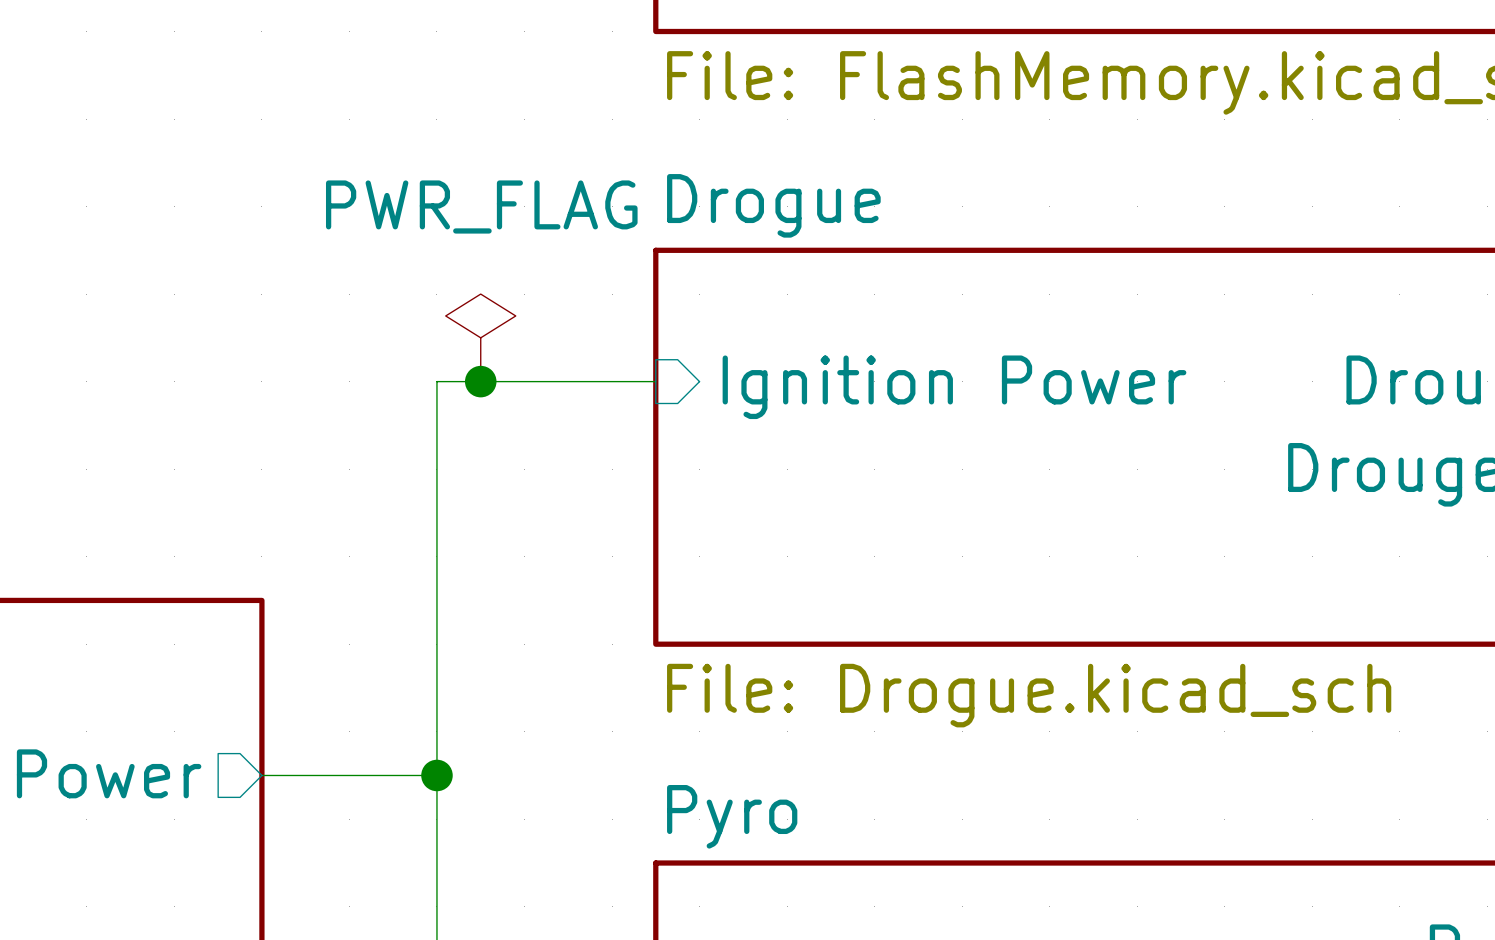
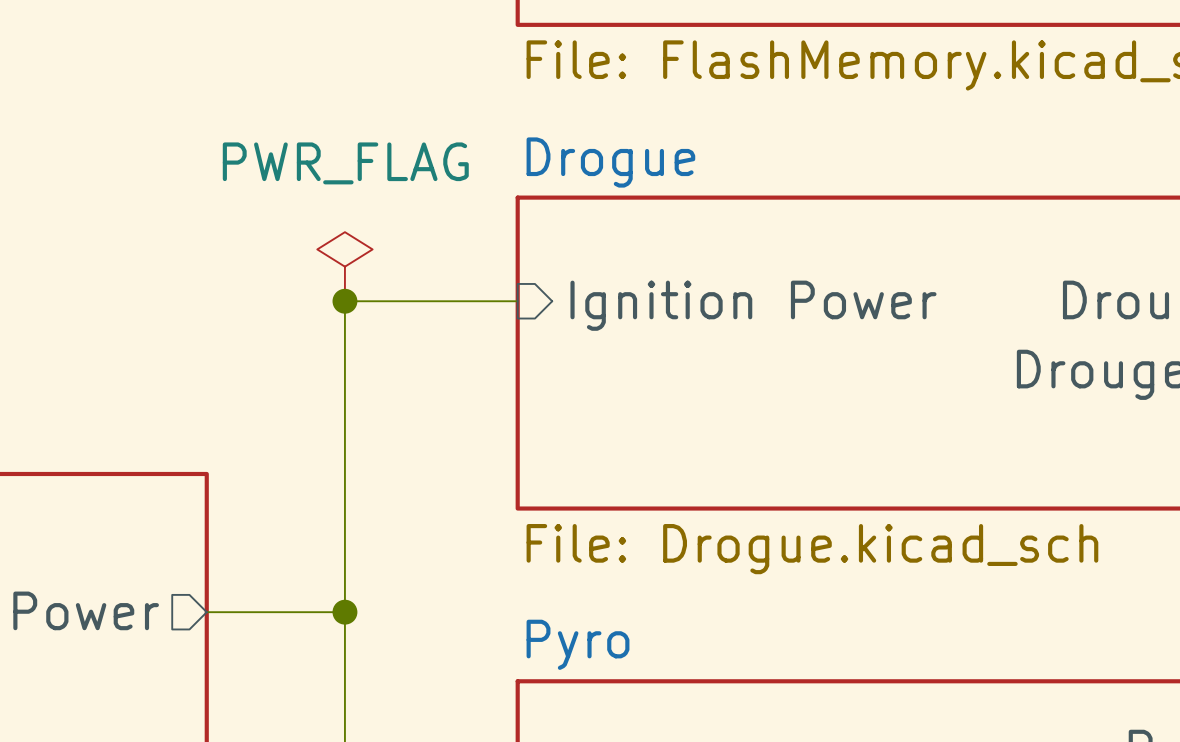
power symbol position: PWR_FLAG (480, 337) -> PWR_FLAG (344, 266)
junction position: (480, 381) -> (344, 301)

